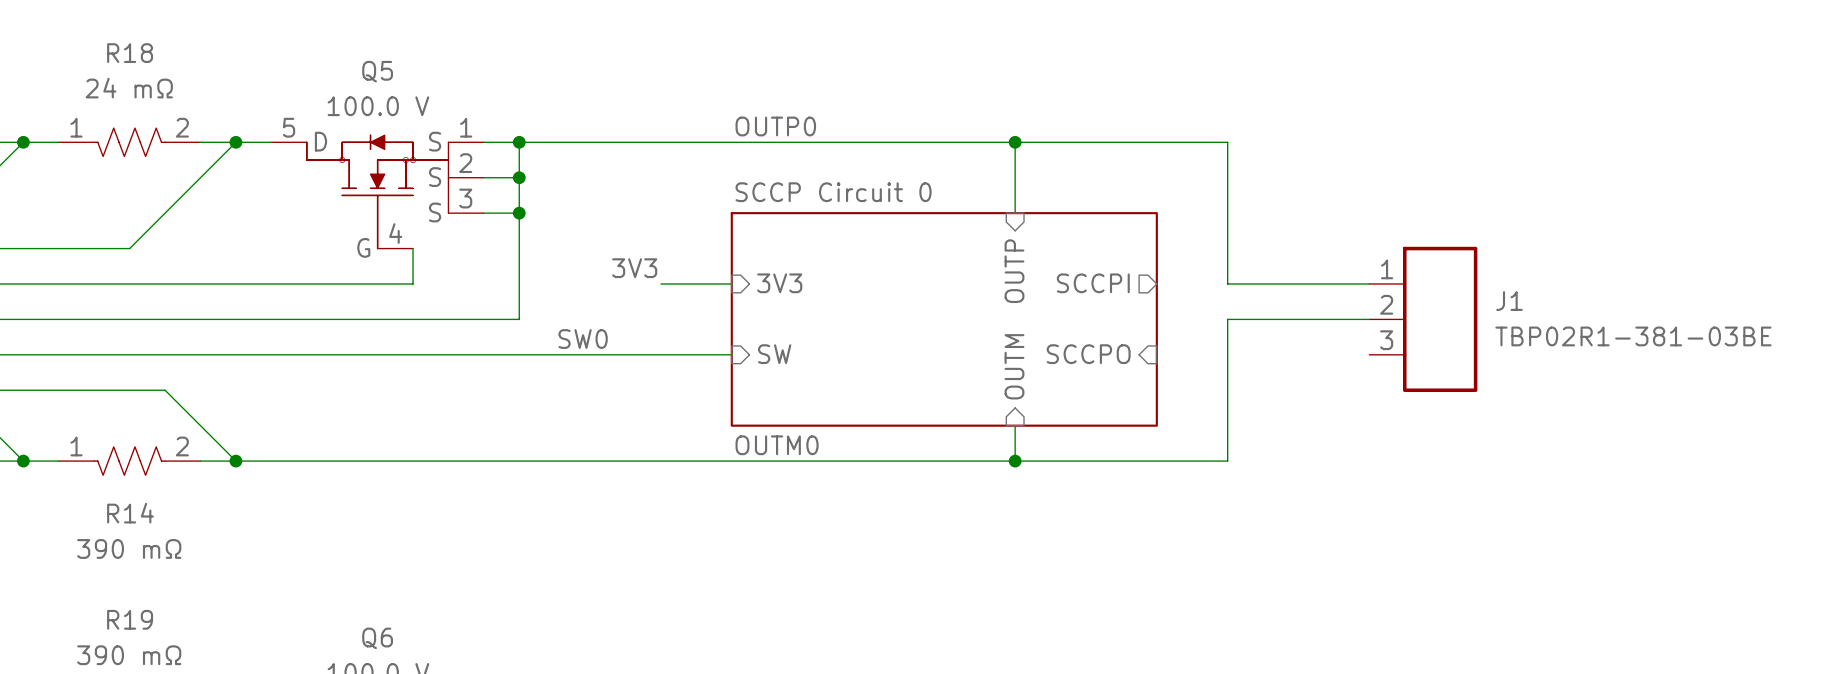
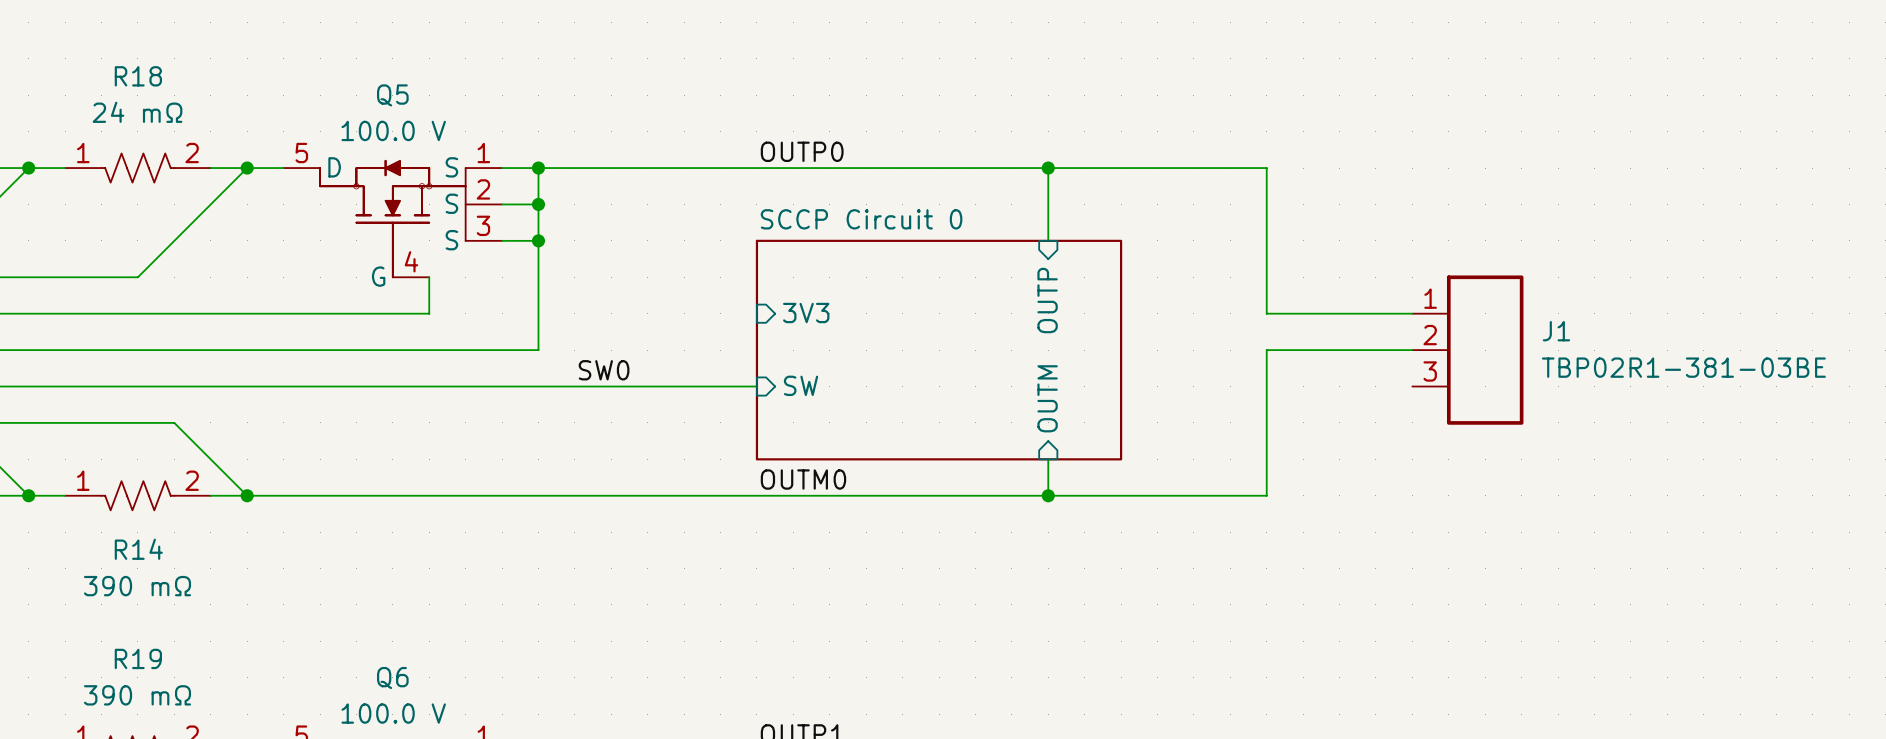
sheet SCCP Circuit 0 shape: [730, 212, 1158, 427] -> [755, 239, 1123, 461]
label: 3V3 (634, 268) -> none
wire: (660, 283) (731, 283) -> none
sheet pin: SCCPI (1093, 283) -> none
sheet pin: SCCPO (1088, 354) -> none

